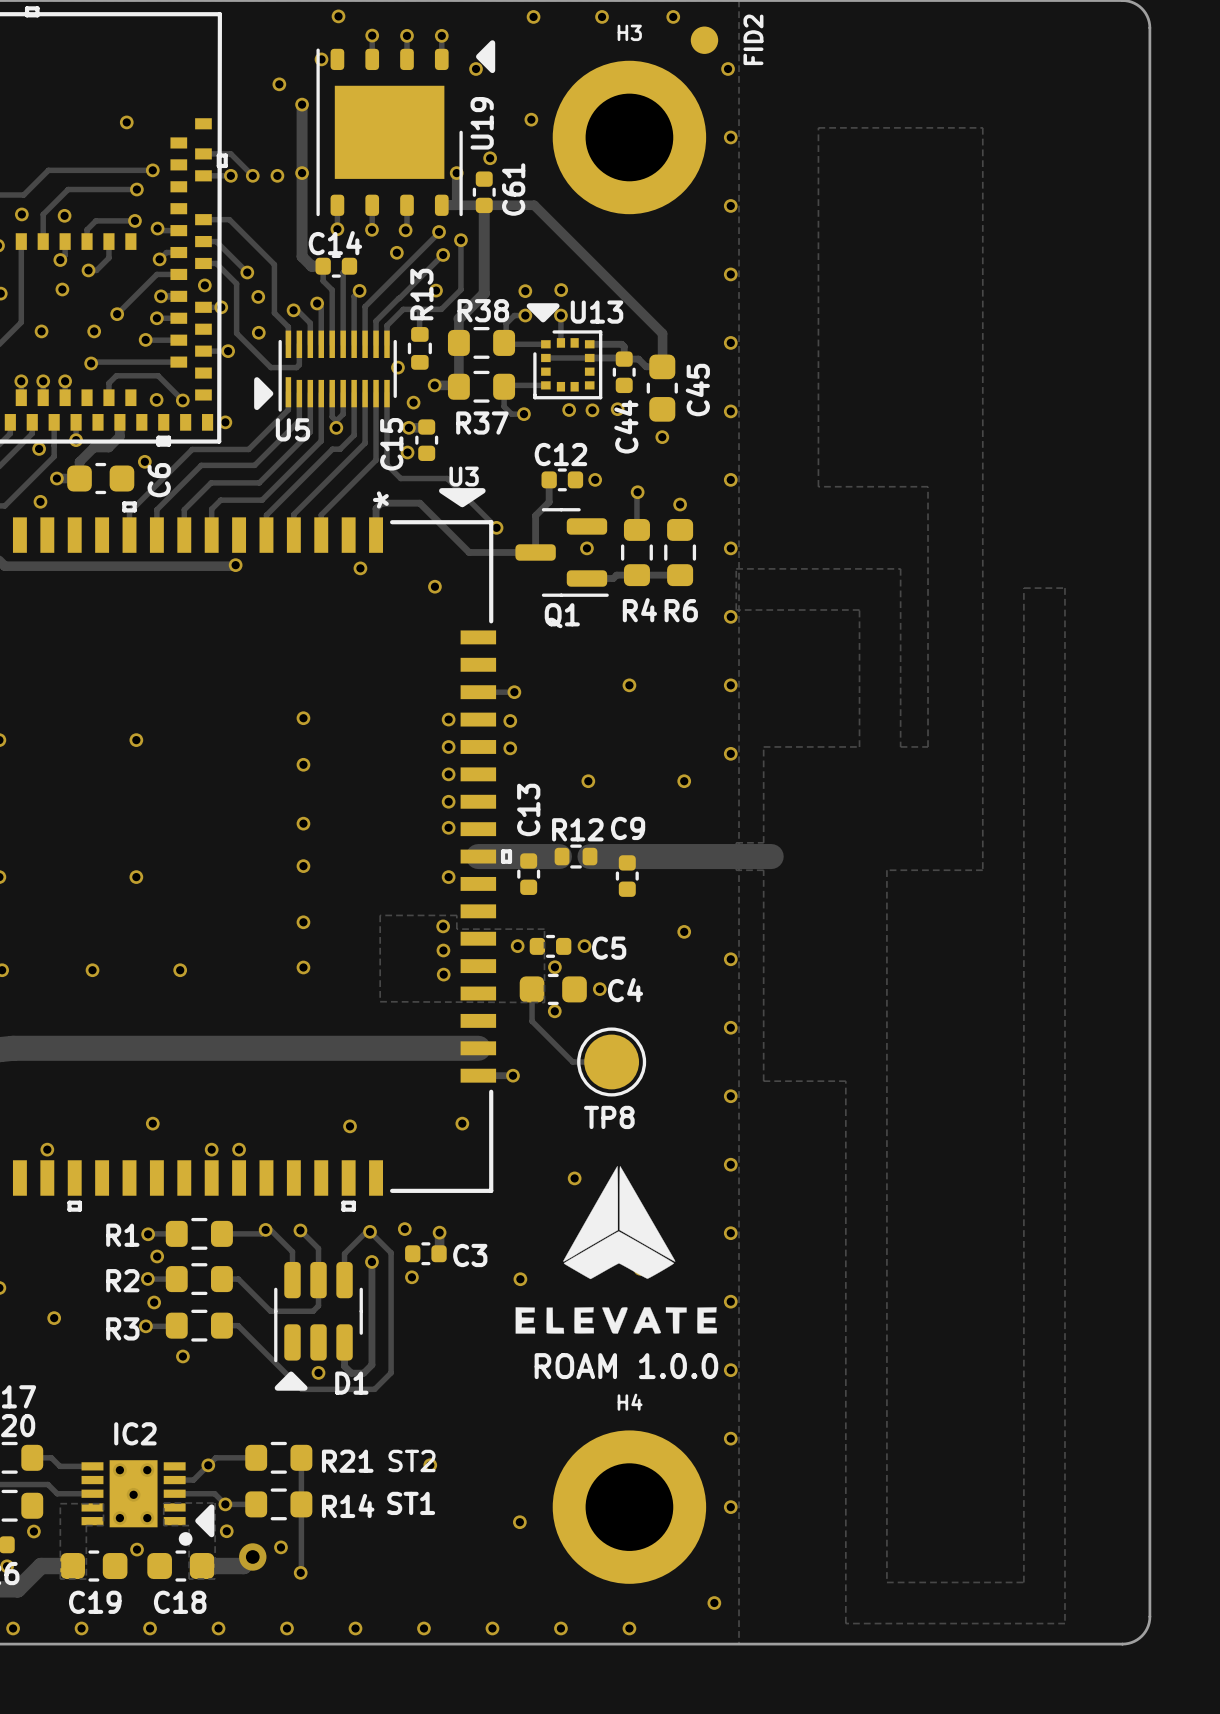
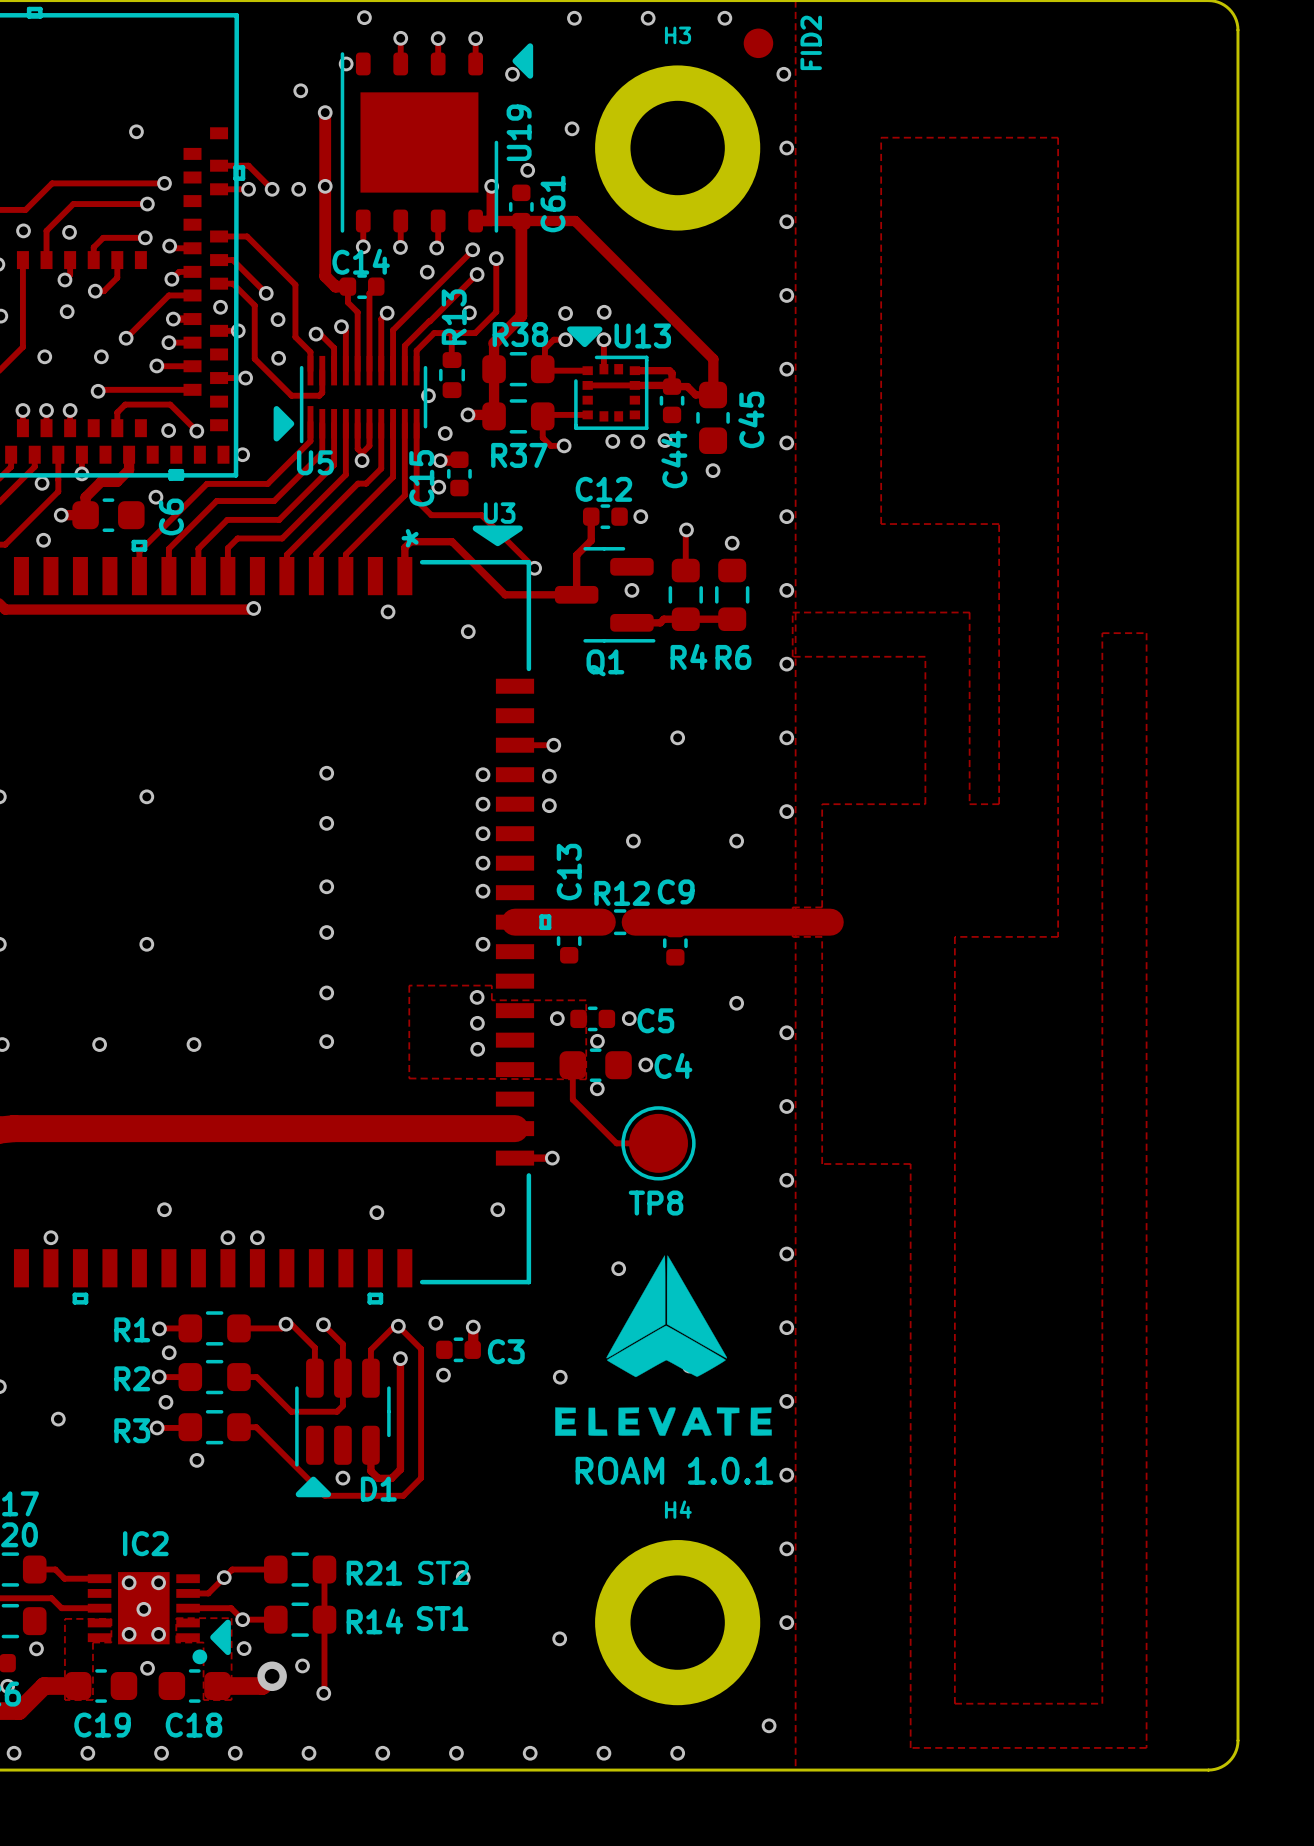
text: ROAM 1.0.0 (626, 1366) -> ROAM 1.0.1 (674, 1470)

